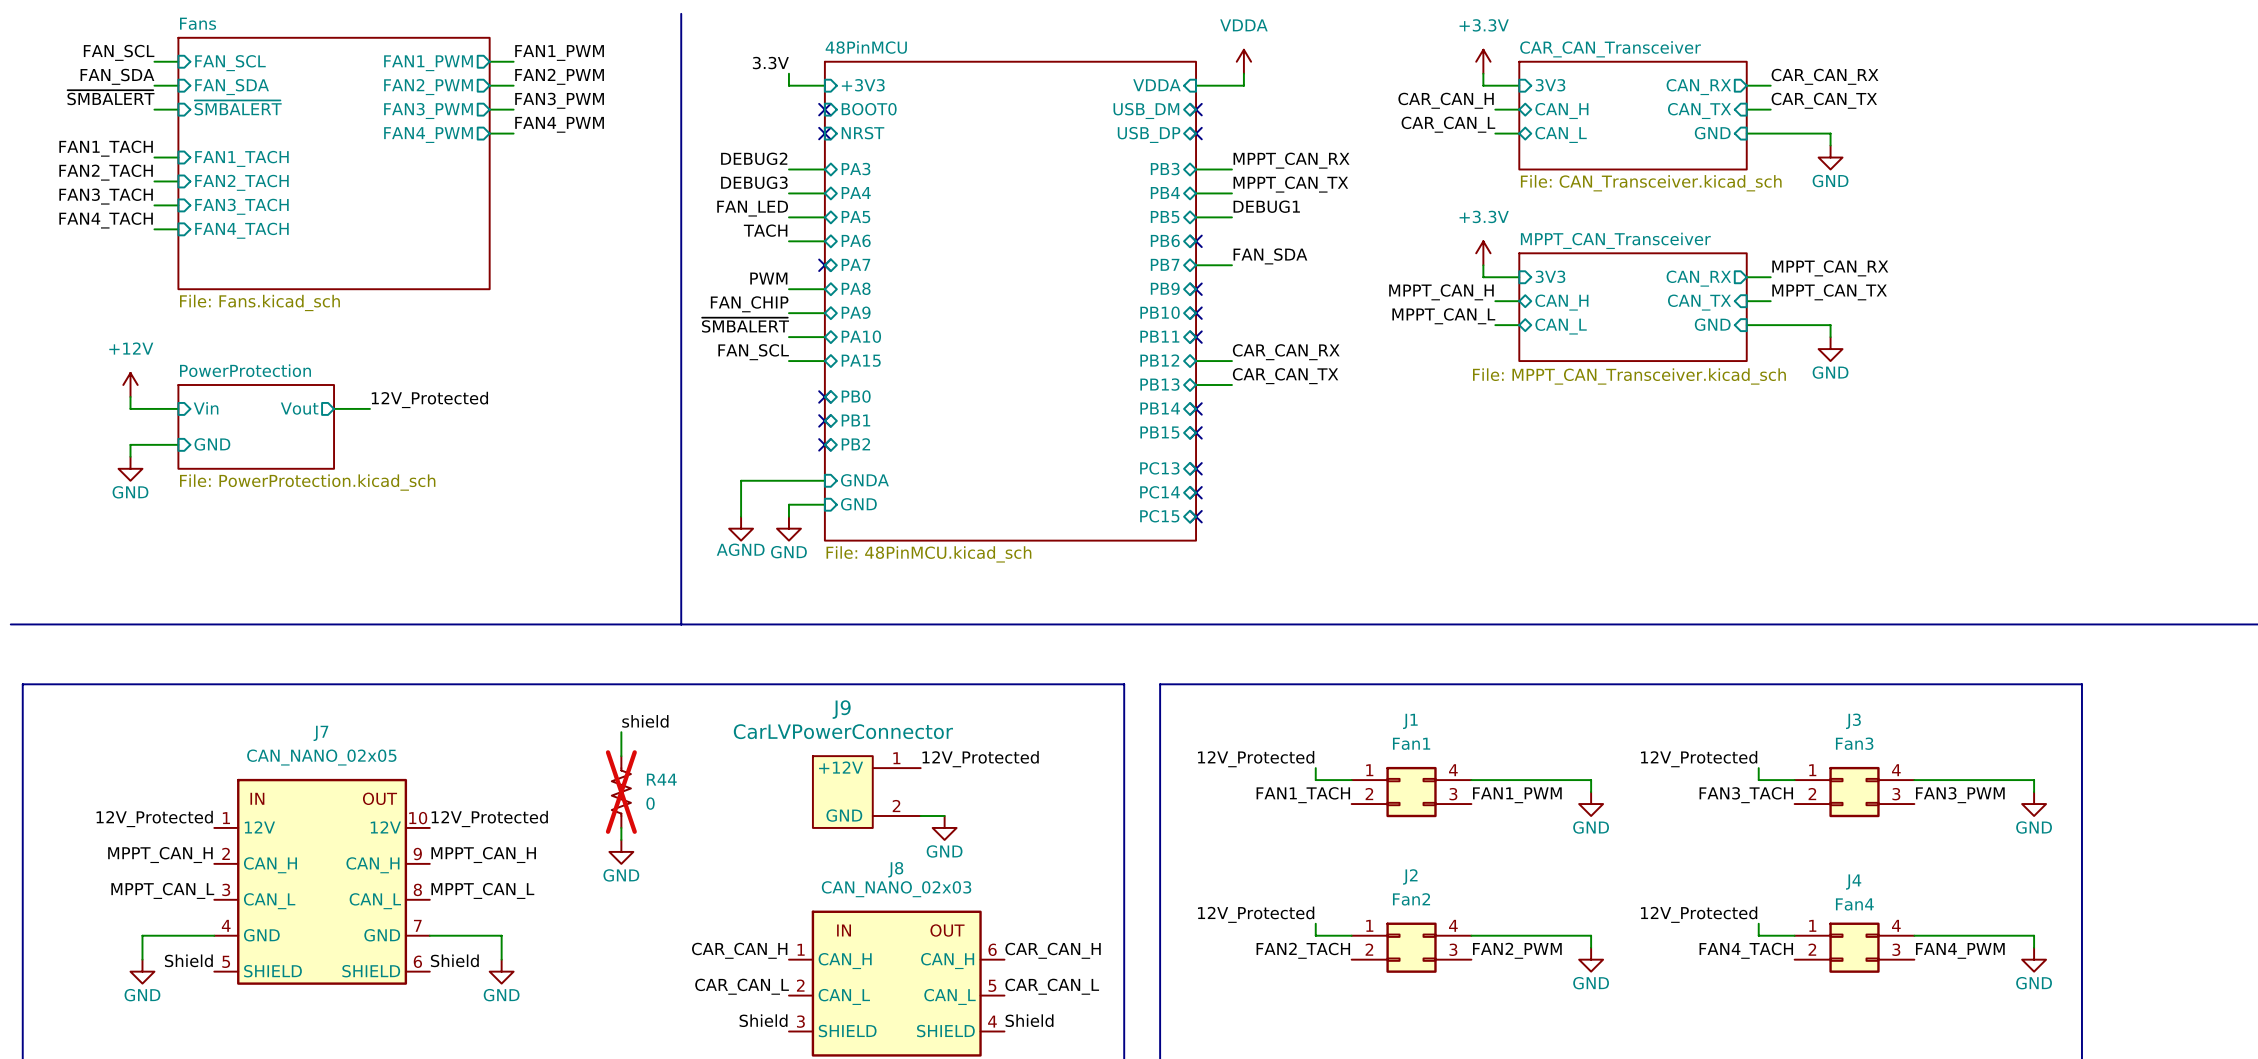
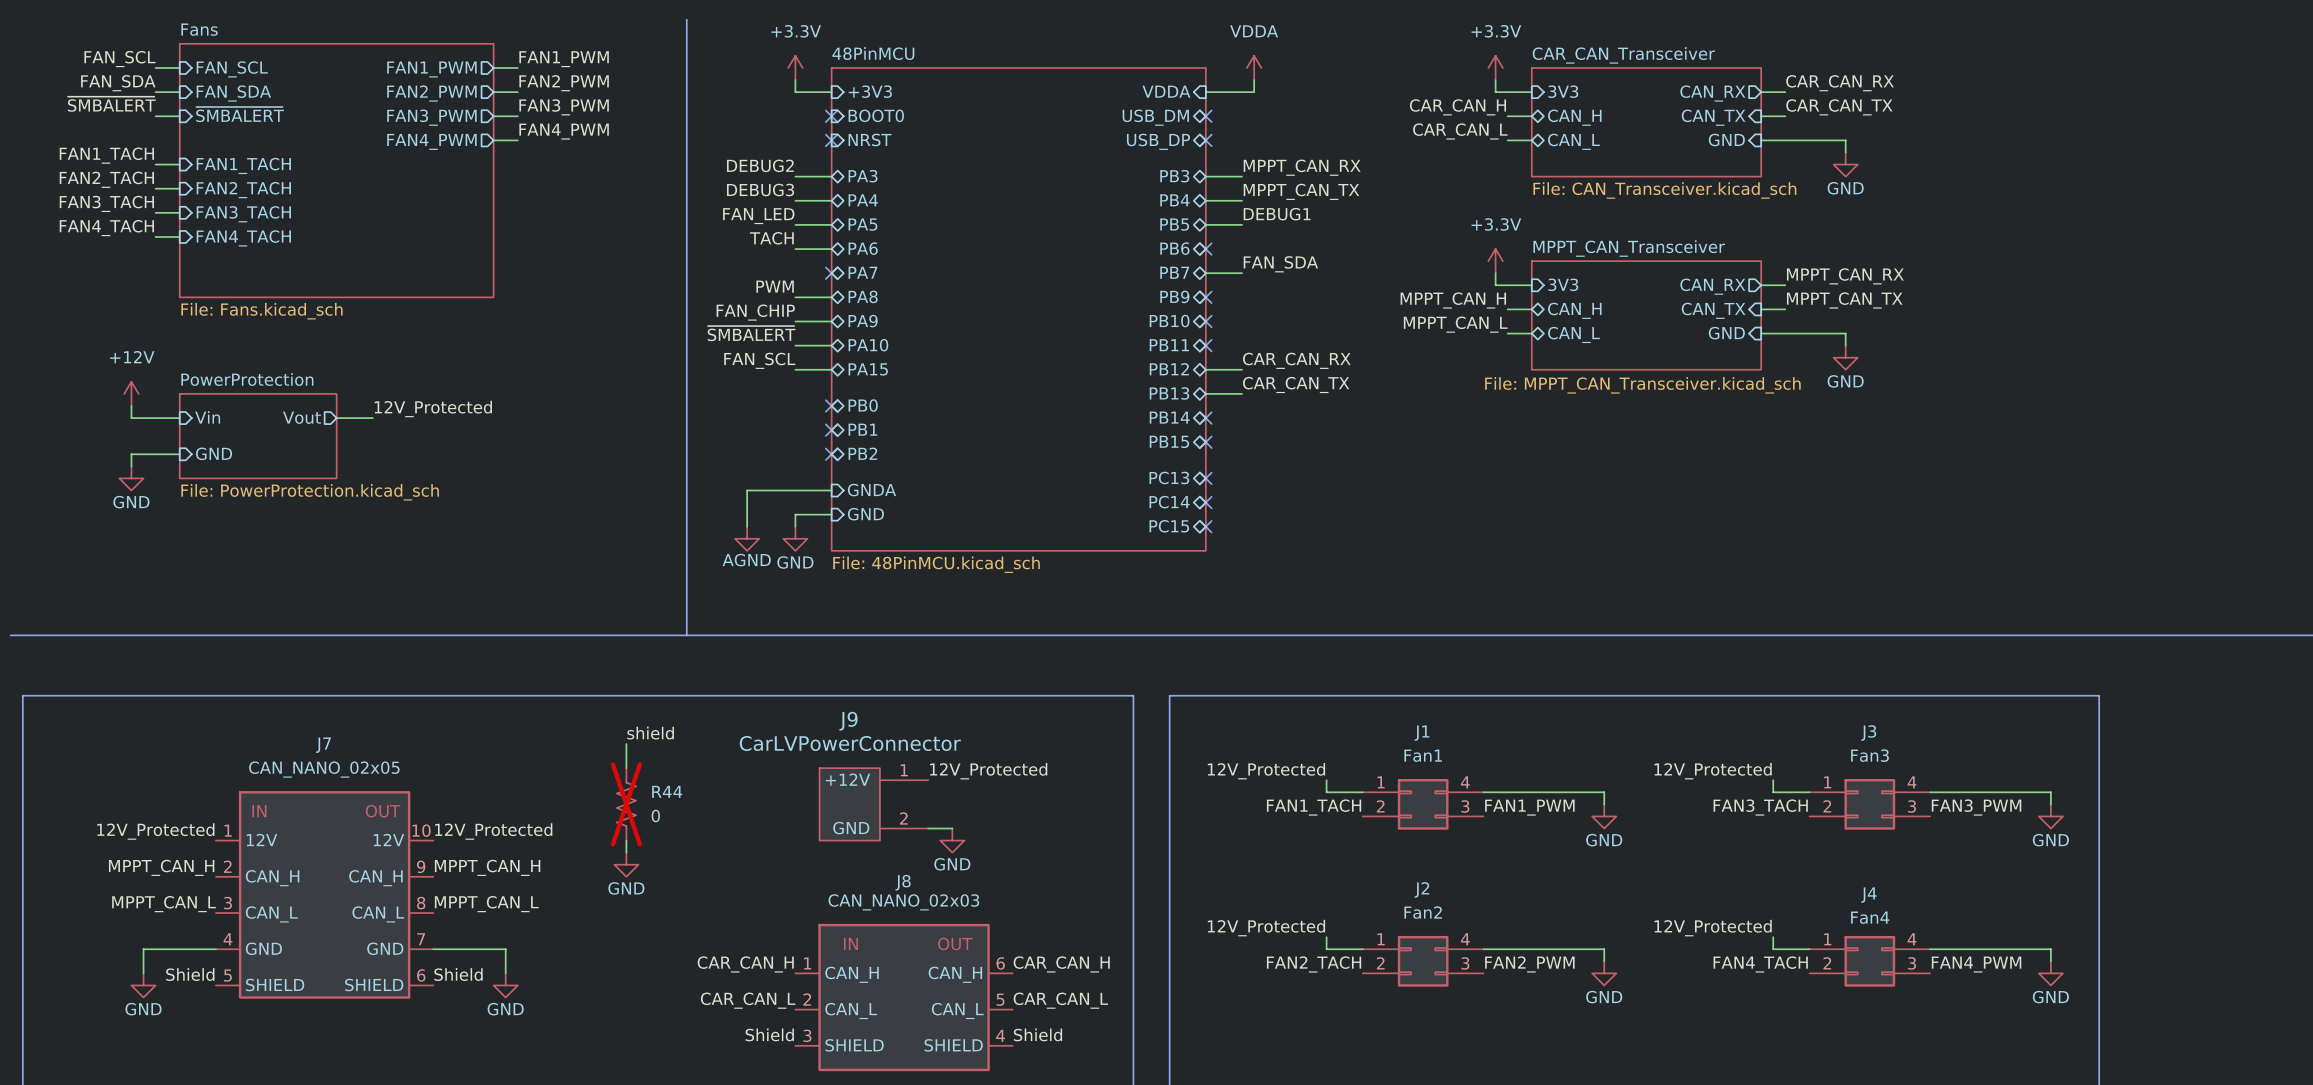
power symbol: none -> +3.3V (795, 67)
label: 3.3V (770, 63) -> none

